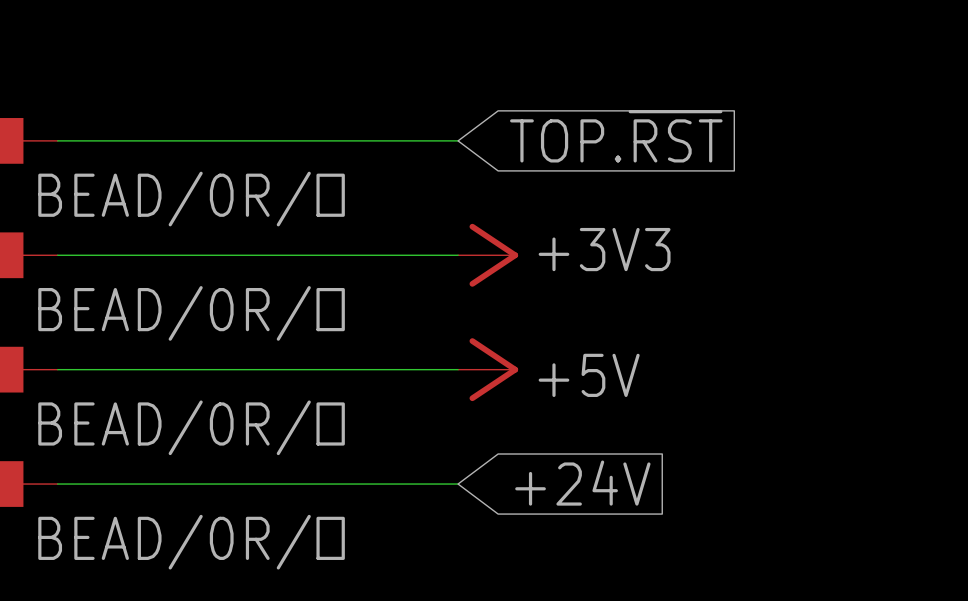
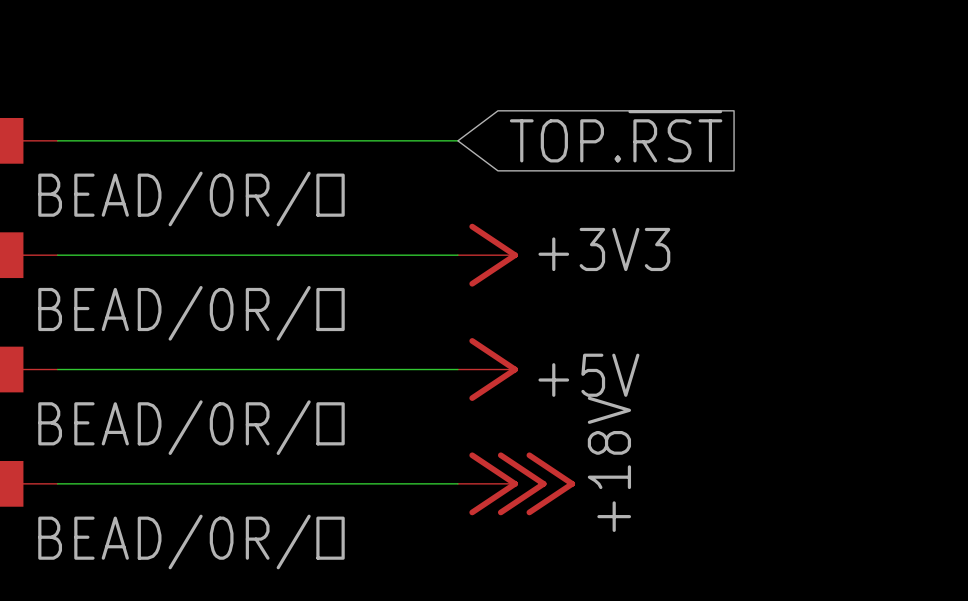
global label: +24V (582, 483) -> none
power symbol: none -> +18V (516, 483)

